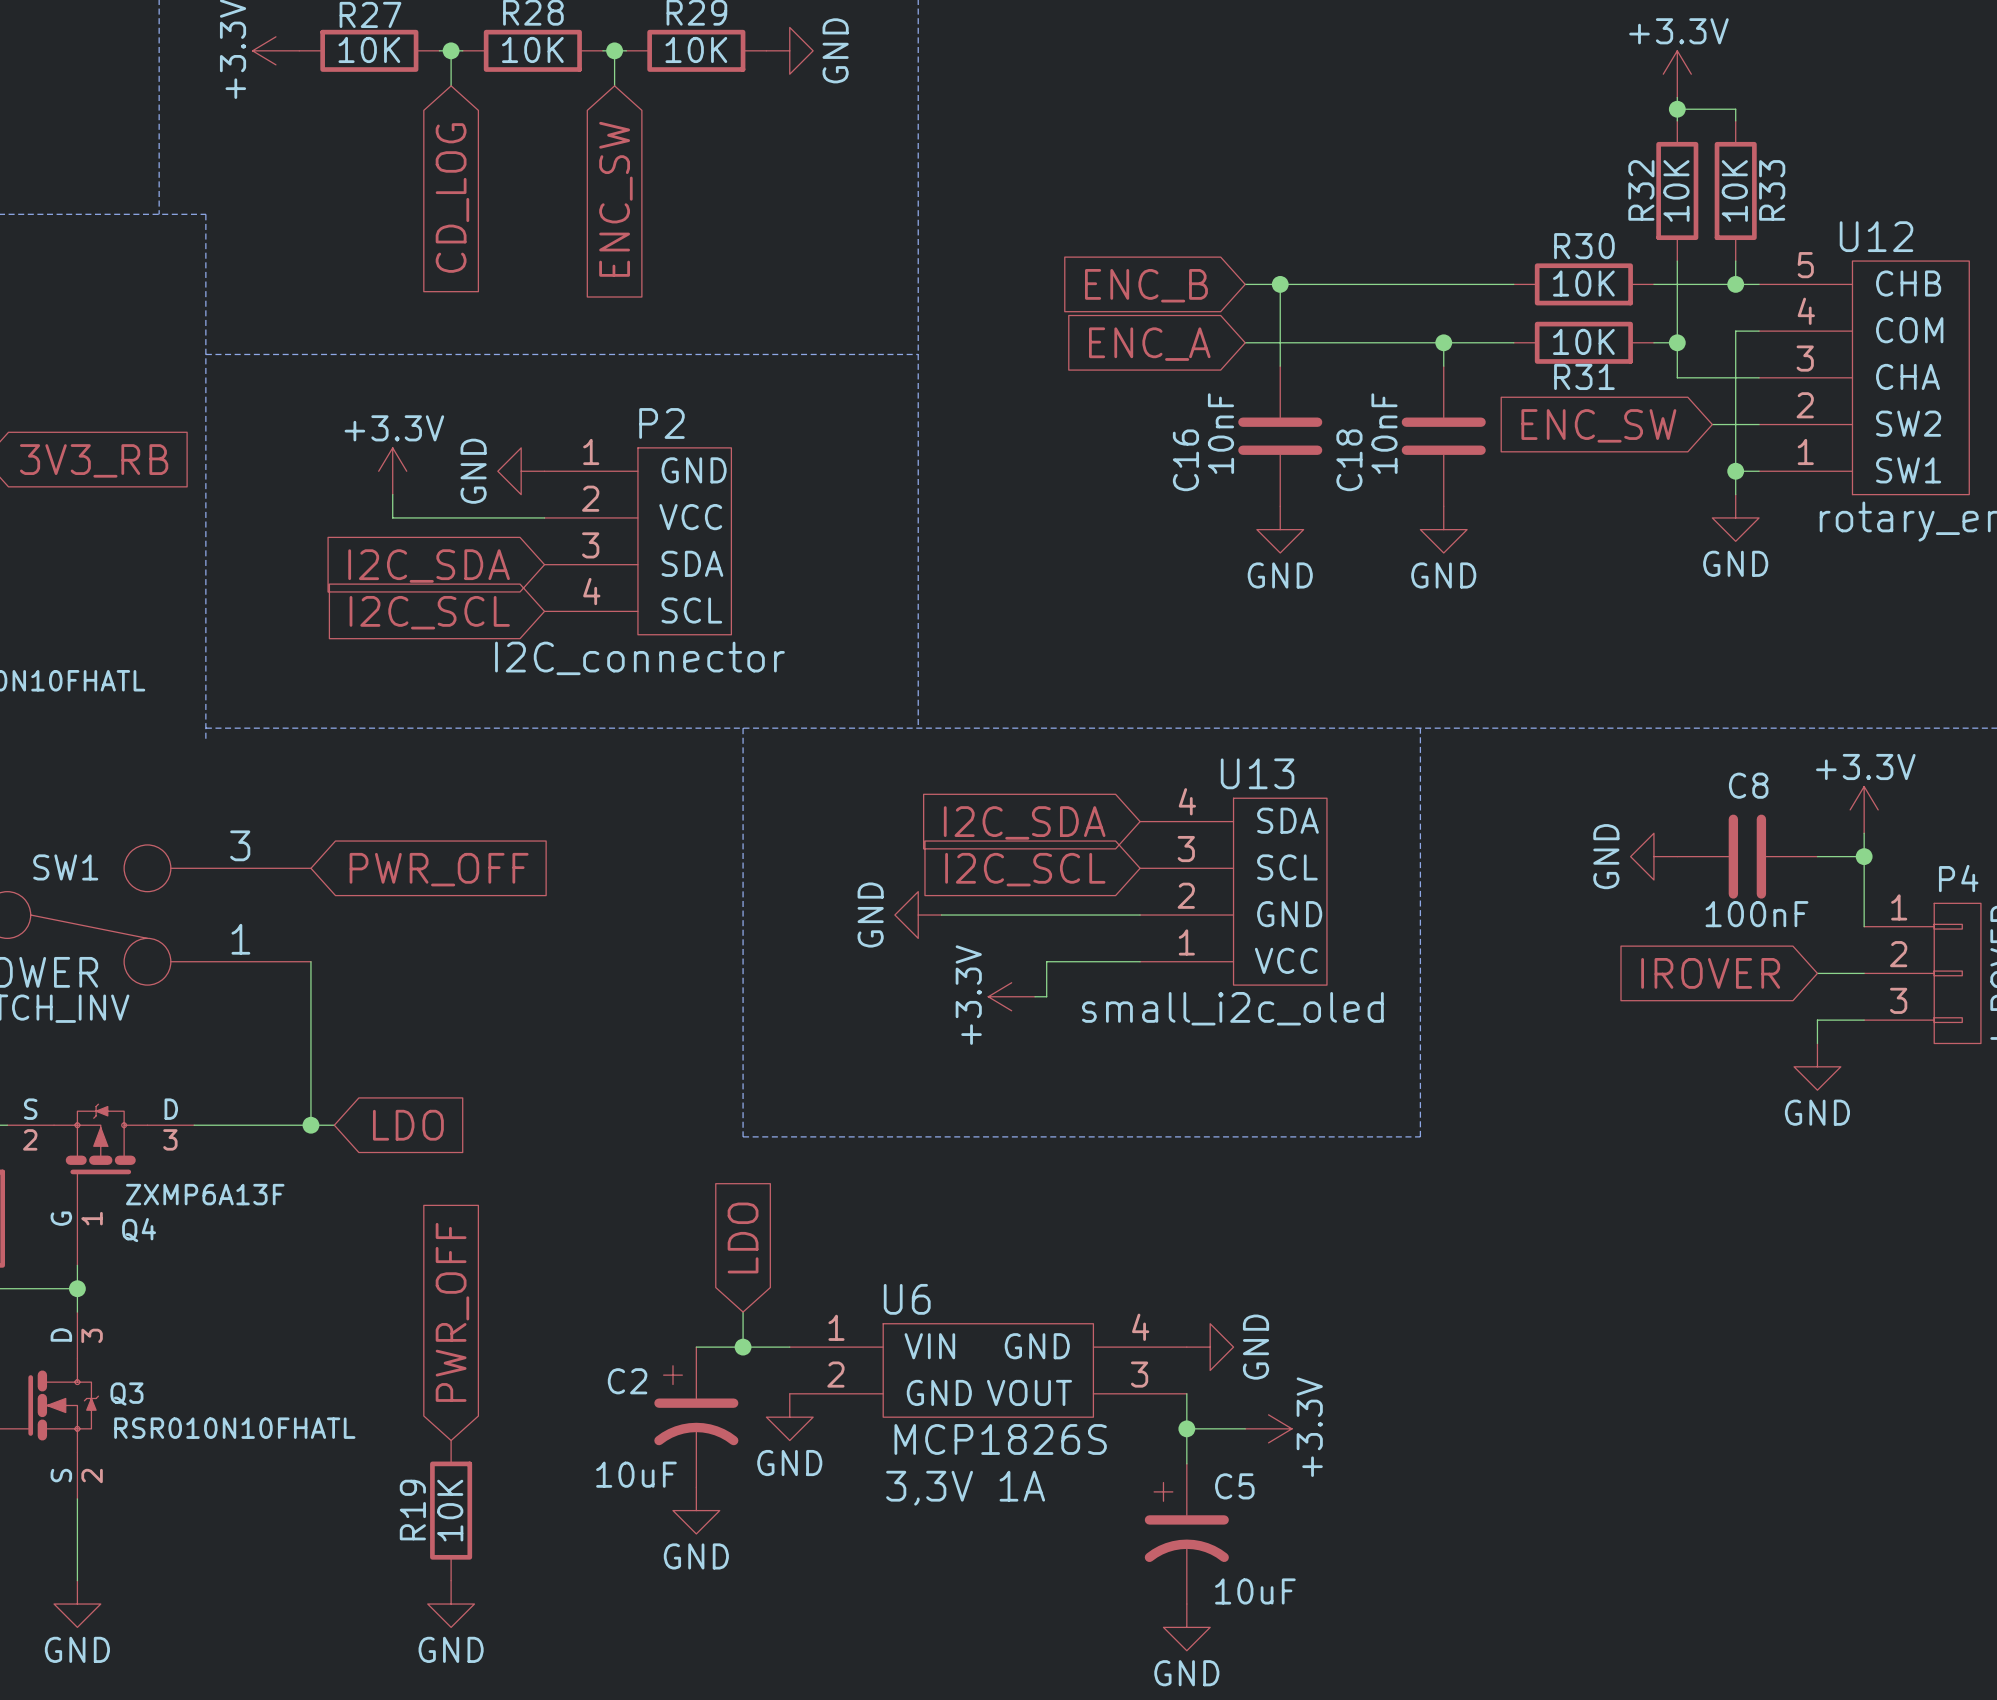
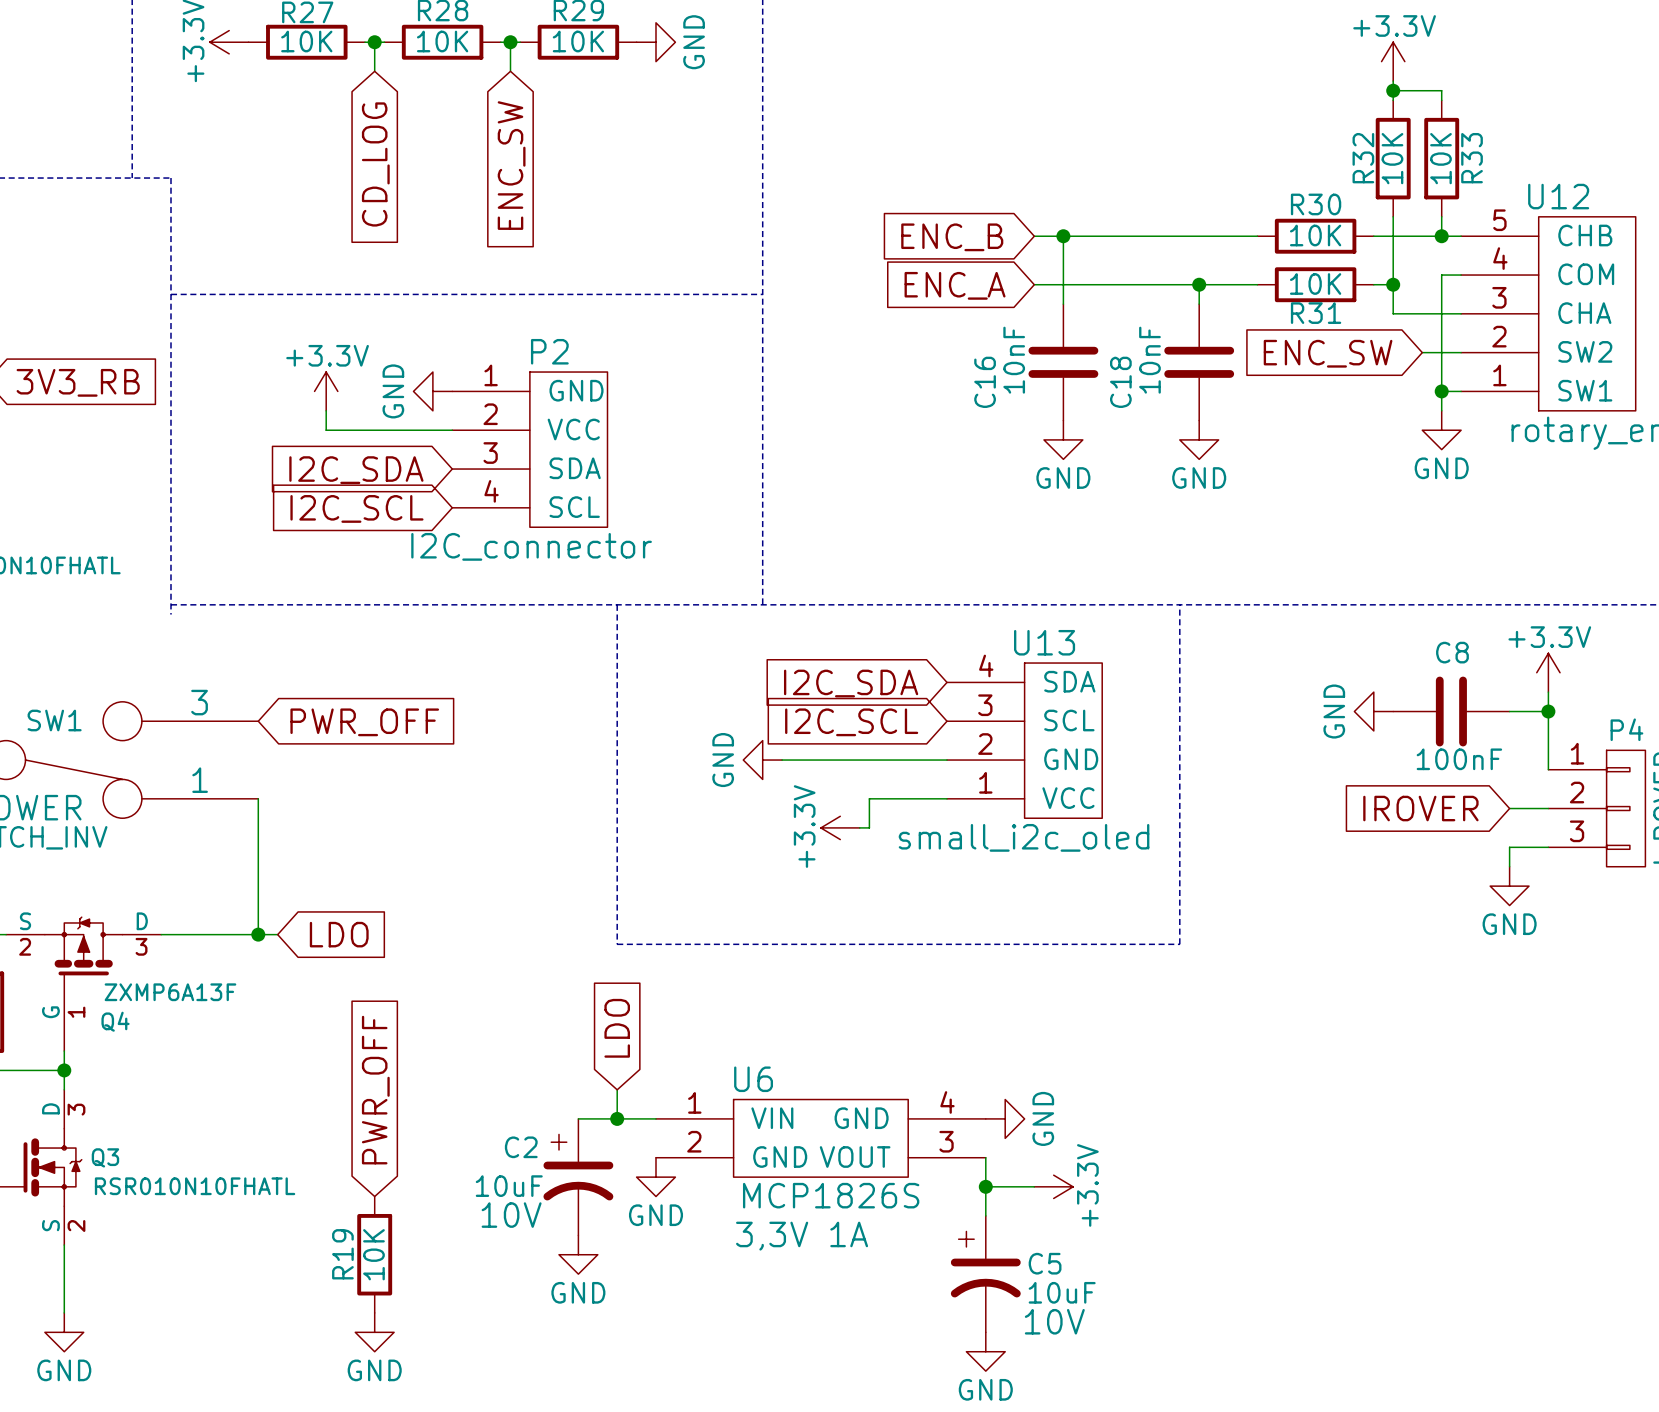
C2 text: none -> 10V (511, 1215)
C2 value position: 10uF (636, 1474) -> 10uF (509, 1186)
C5 name position: C5 (1234, 1486) -> C5 (1045, 1263)
C5 value position: 10uF (1255, 1591) -> 10uF (1062, 1292)
C5 text: none -> 10V (1054, 1321)

